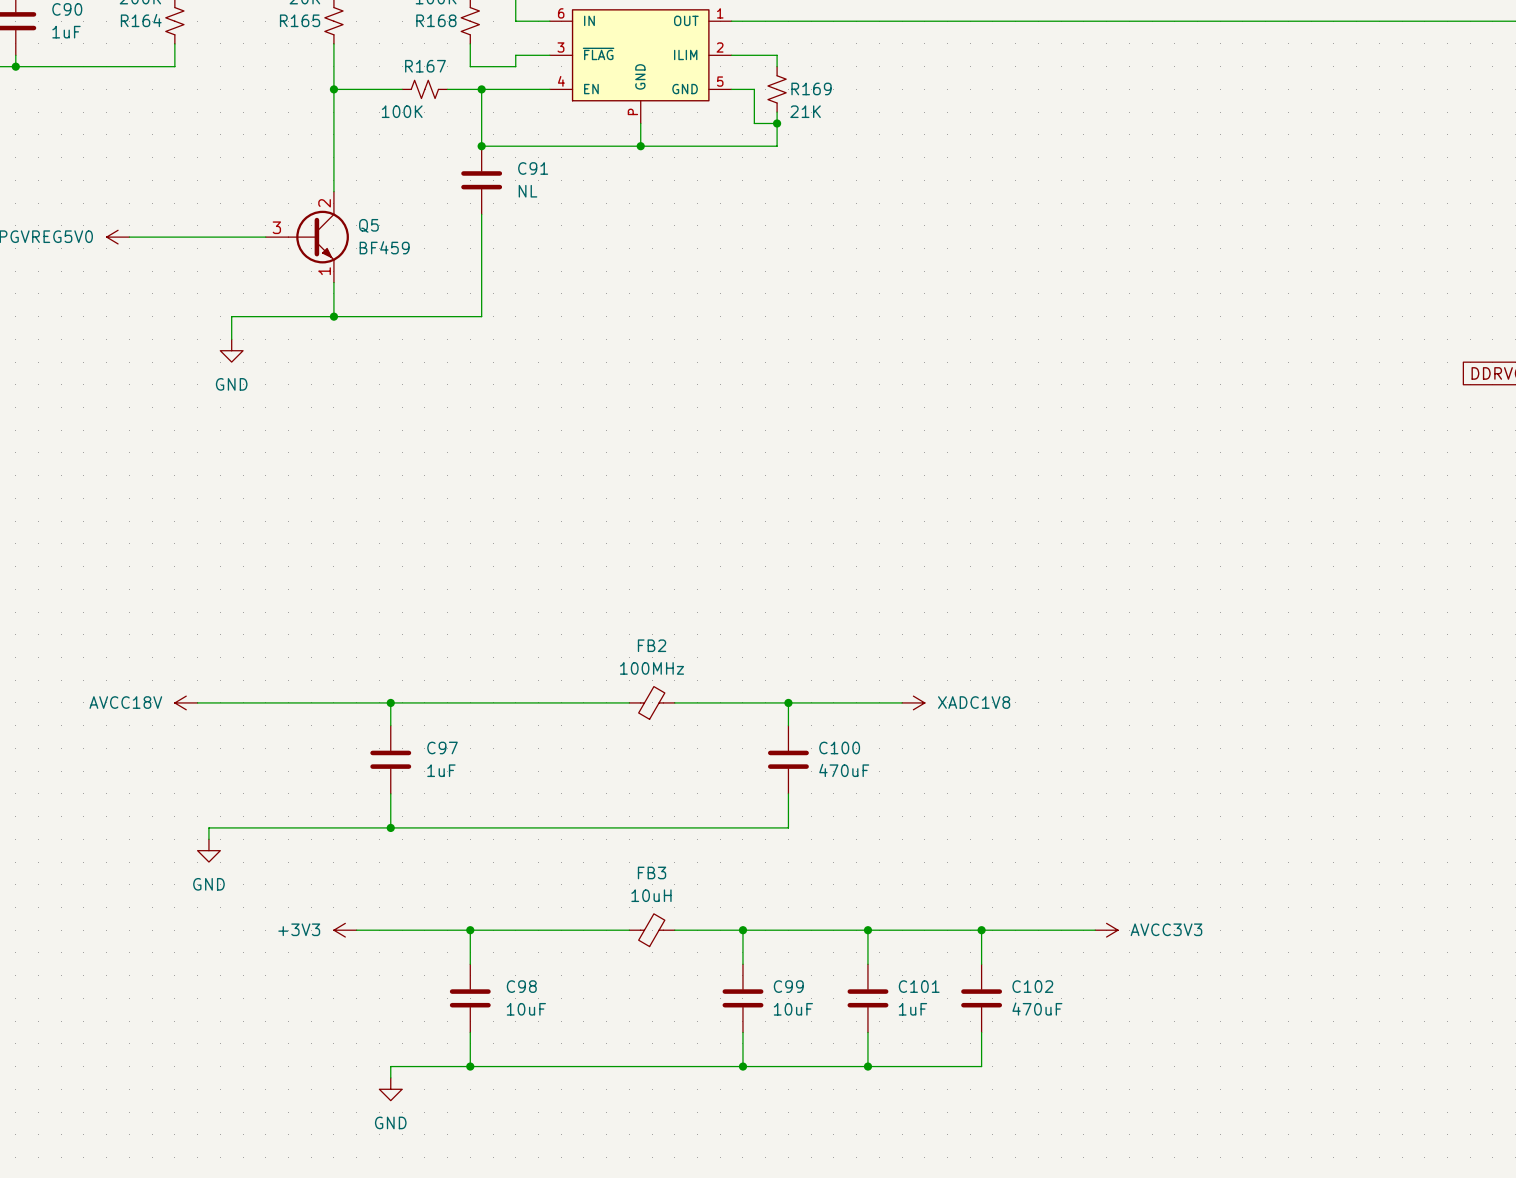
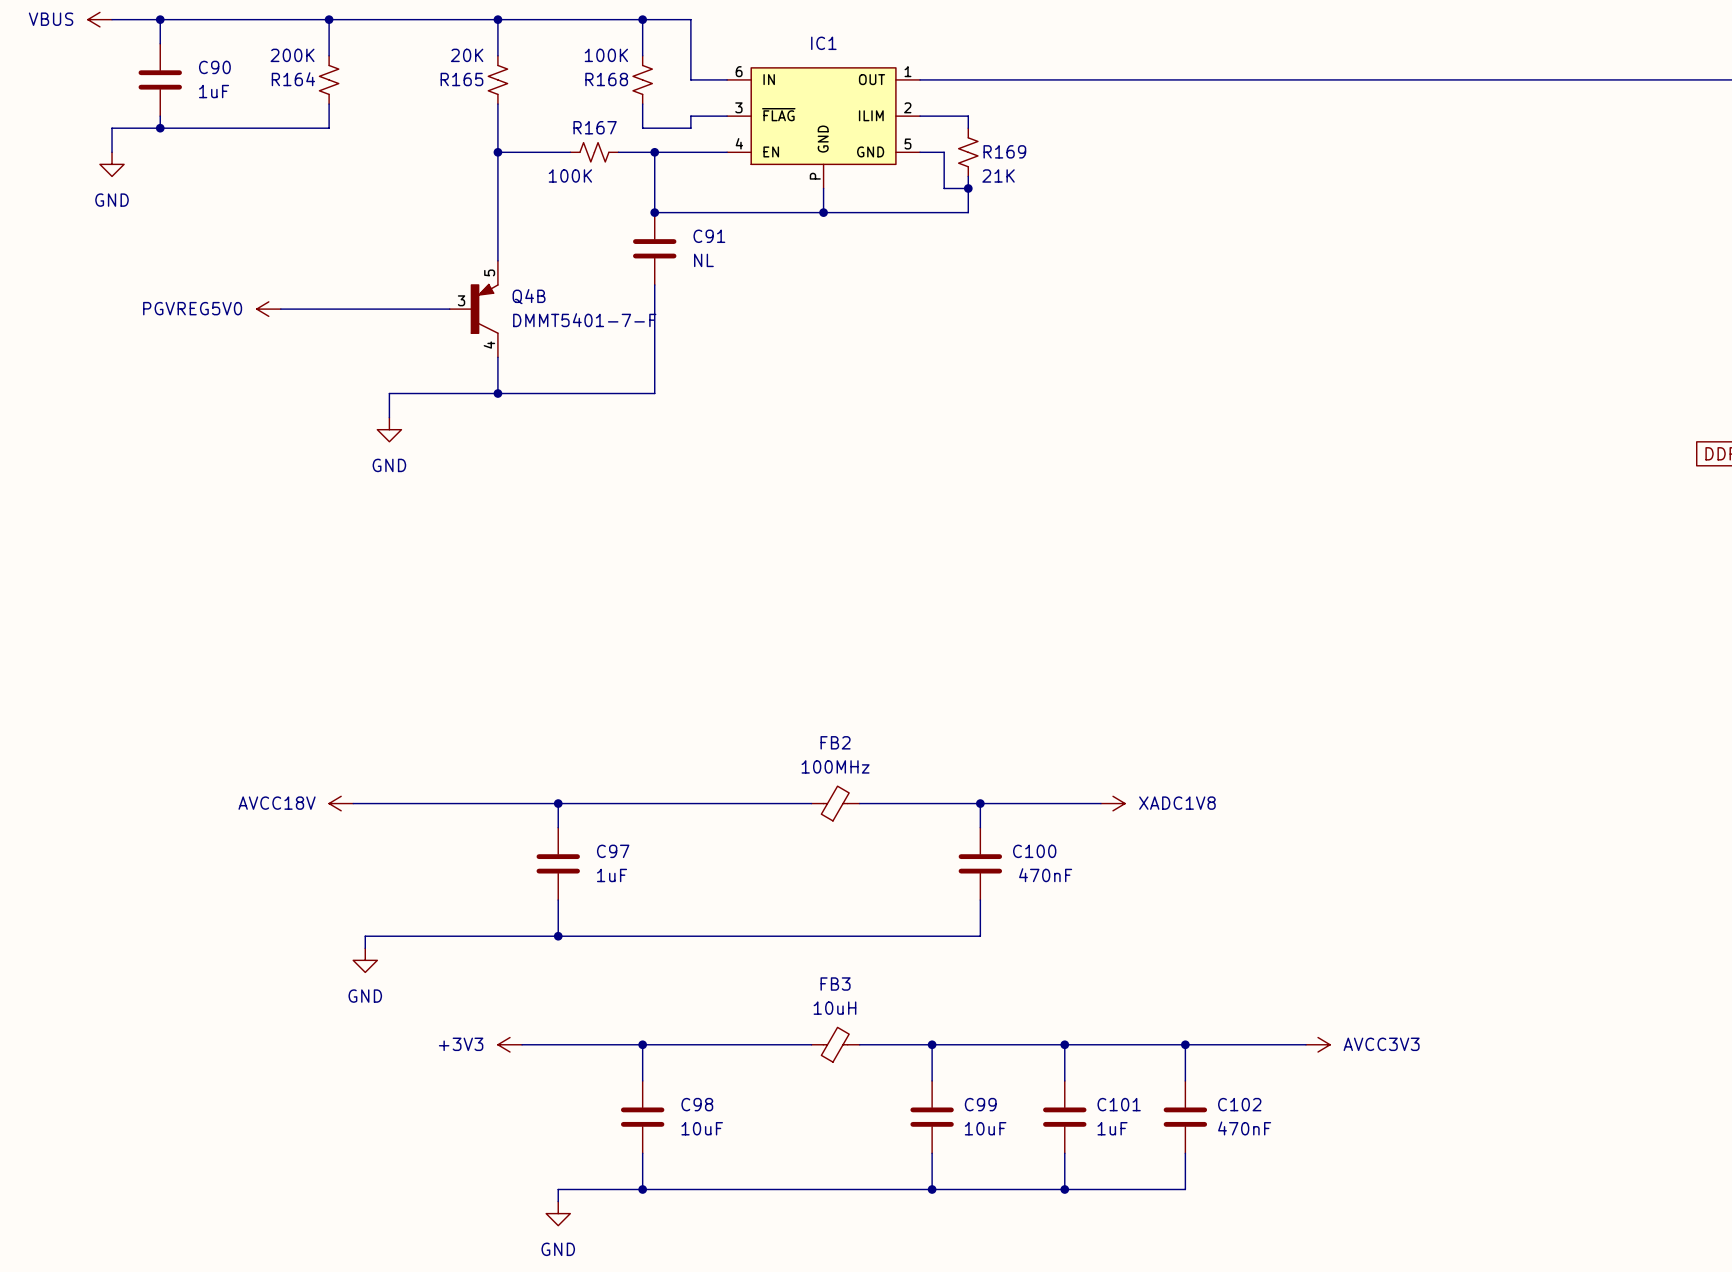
Q5: BF459 (307, 237) -> none
Q4B: none -> DMMT5401-7-F (474, 309)
C100 value: 470uF (844, 770) -> 470nF (1045, 875)
C102 value: 470uF (1037, 1009) -> 470nF (1244, 1128)

